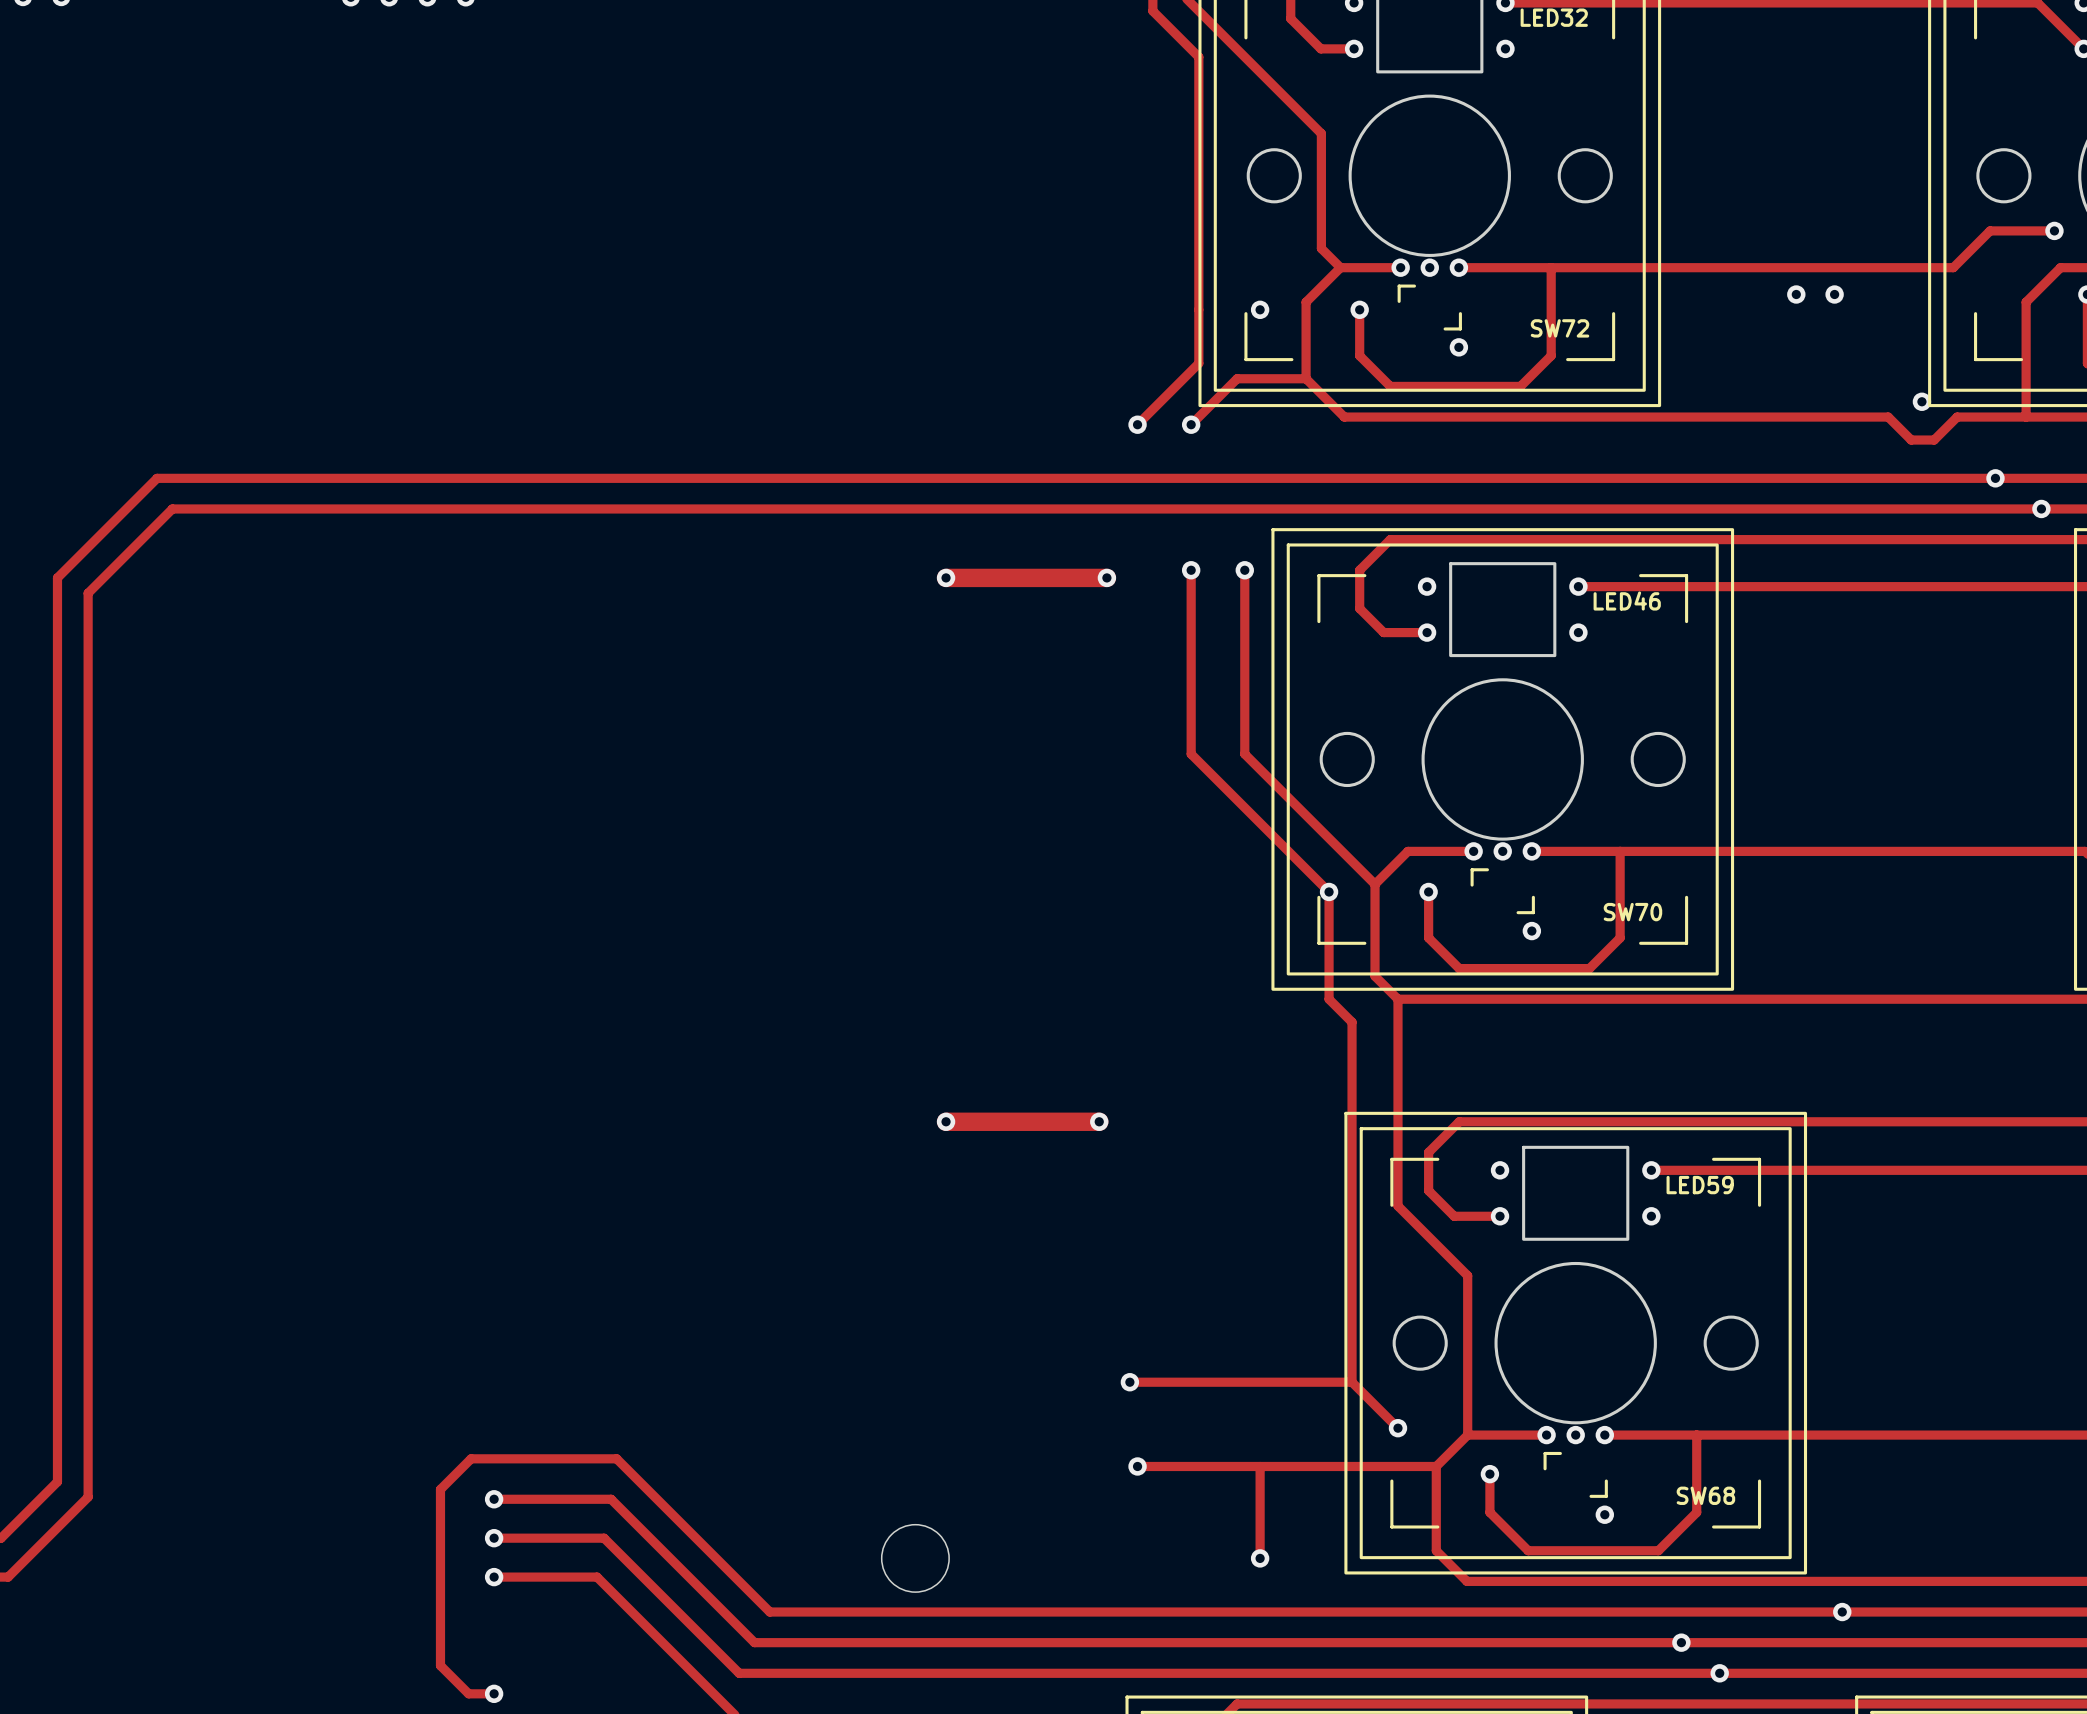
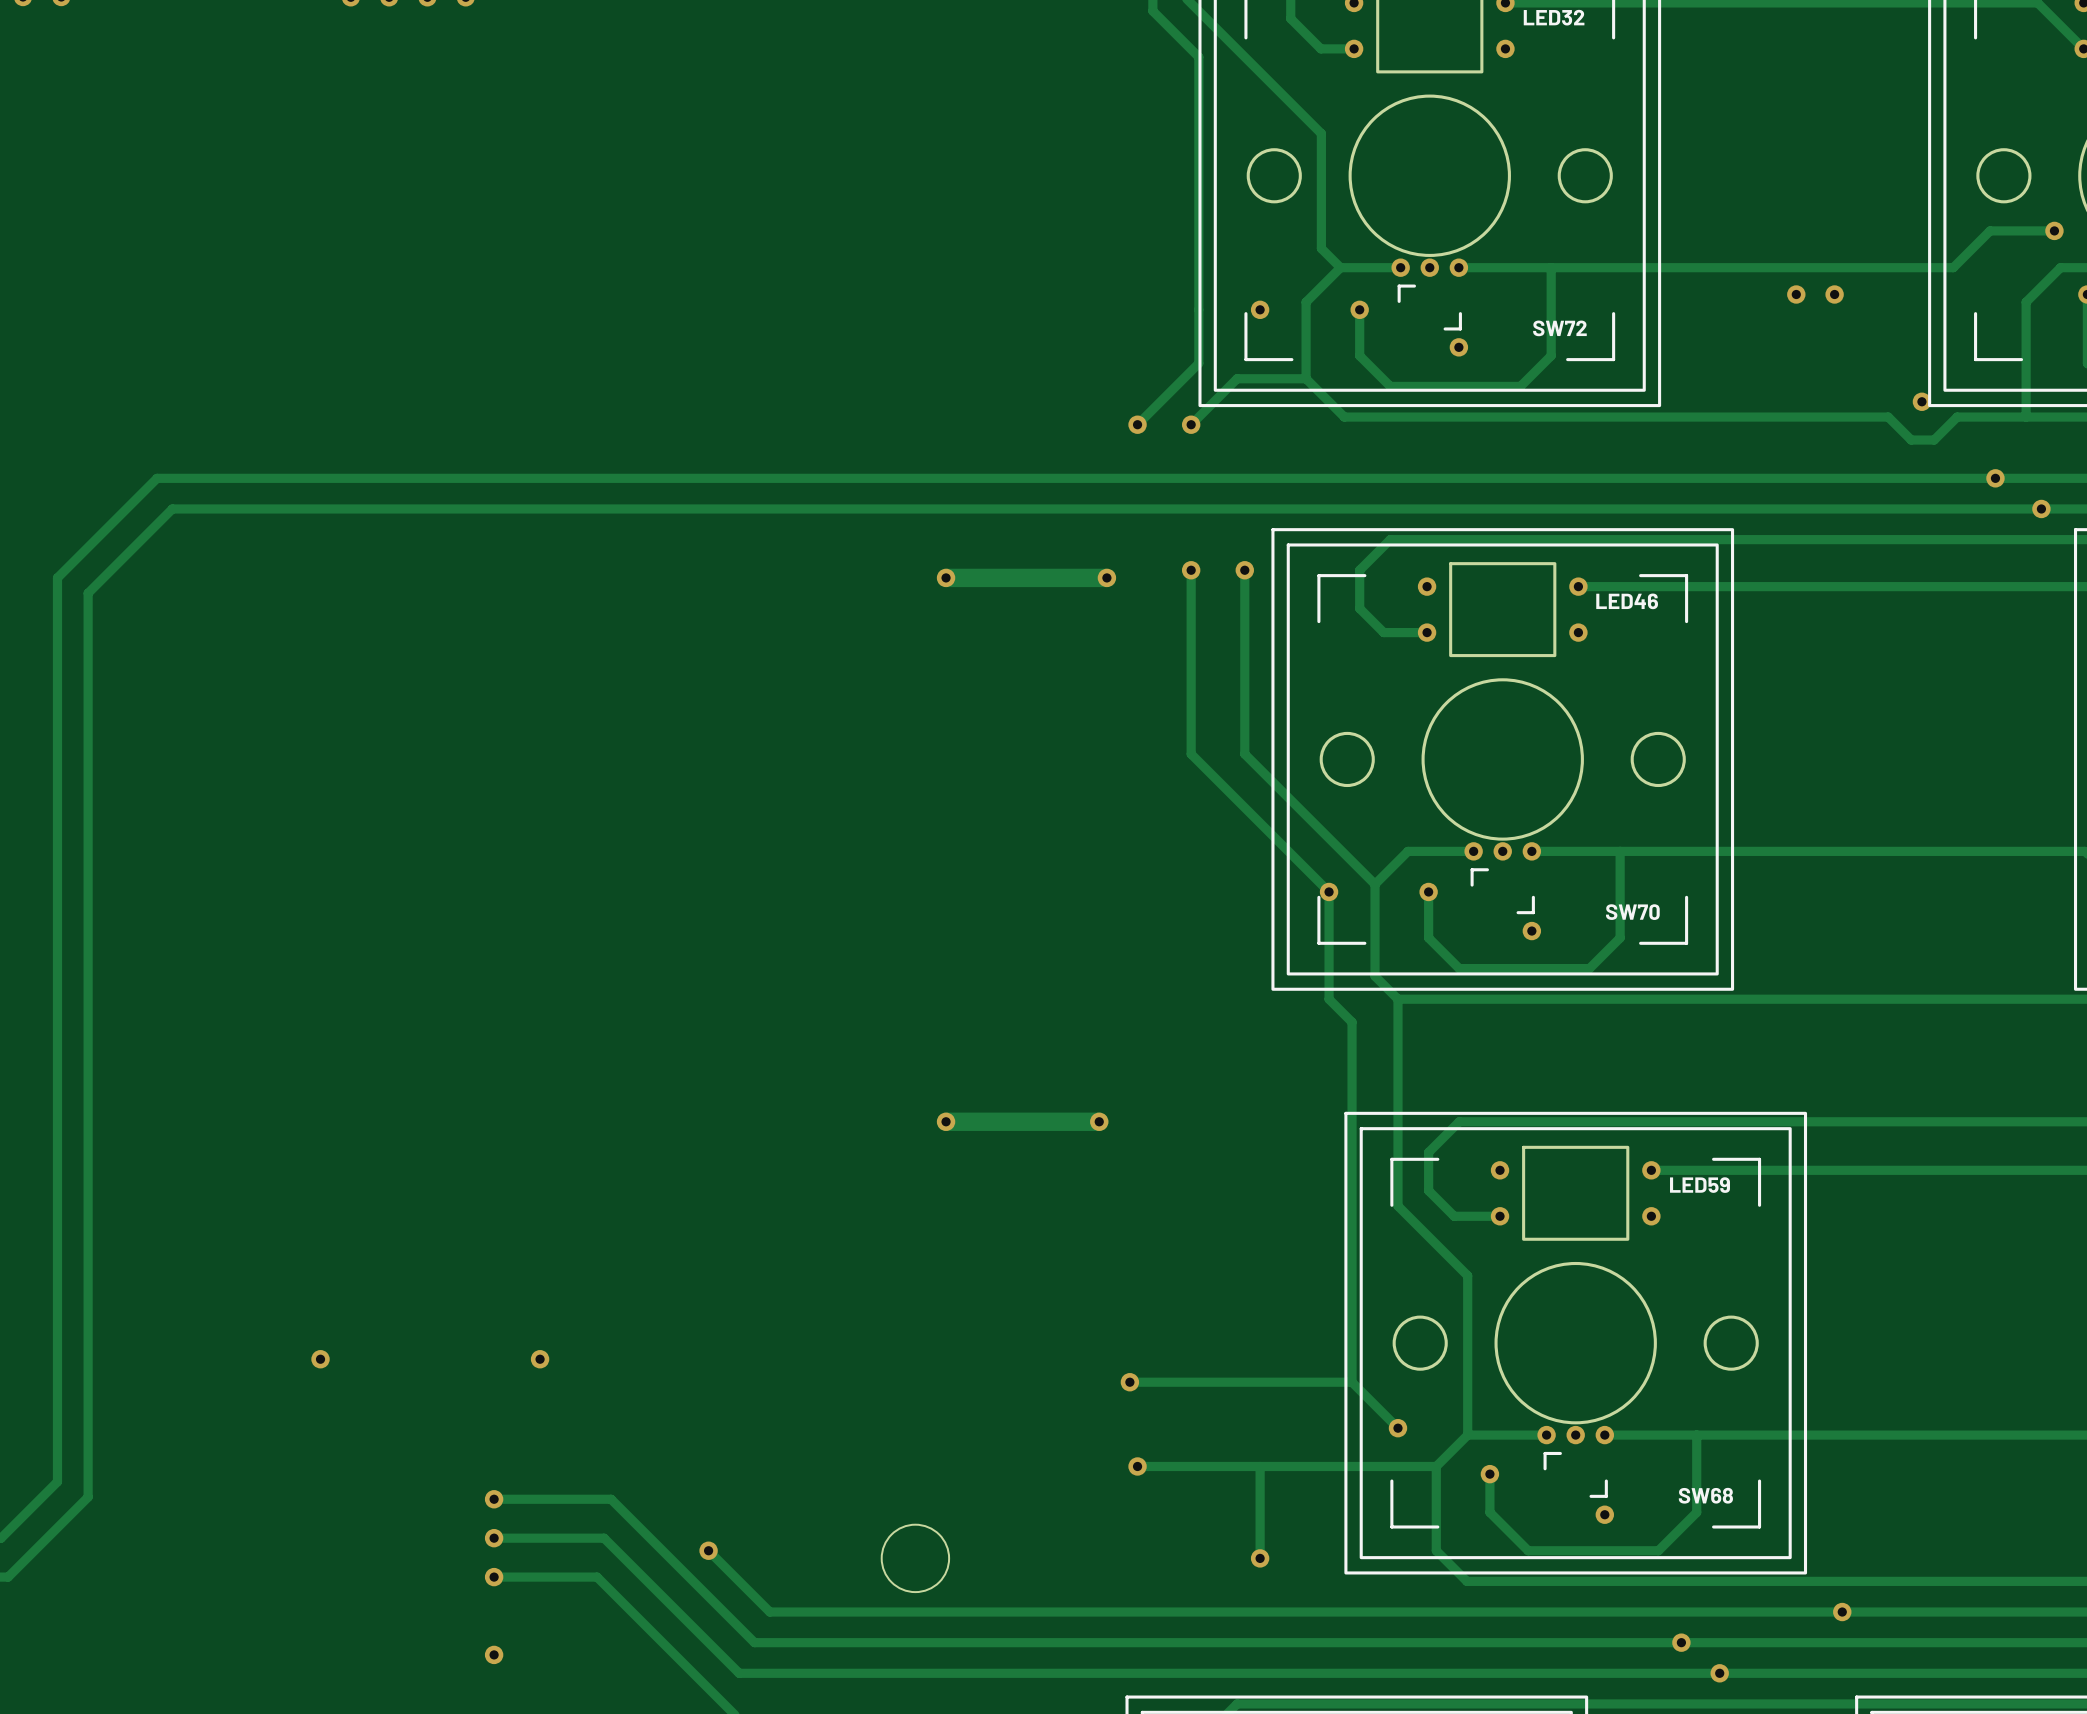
via: none -> (320, 1359)
via: none -> (540, 1359)
track: (708, 1550) (616, 1458) (471, 1458) (440, 1489) (440, 1665) (468, 1693) (494, 1693) -> none
via: none -> (708, 1550)
via position: (494, 1693) -> (494, 1654)

